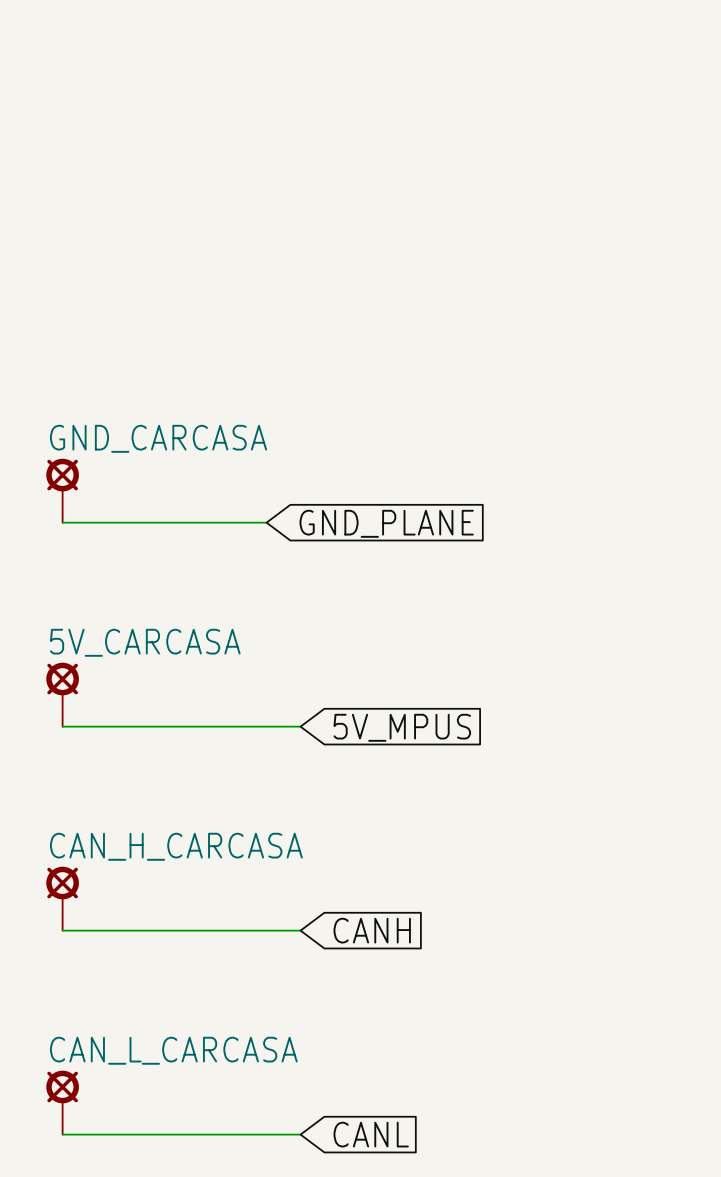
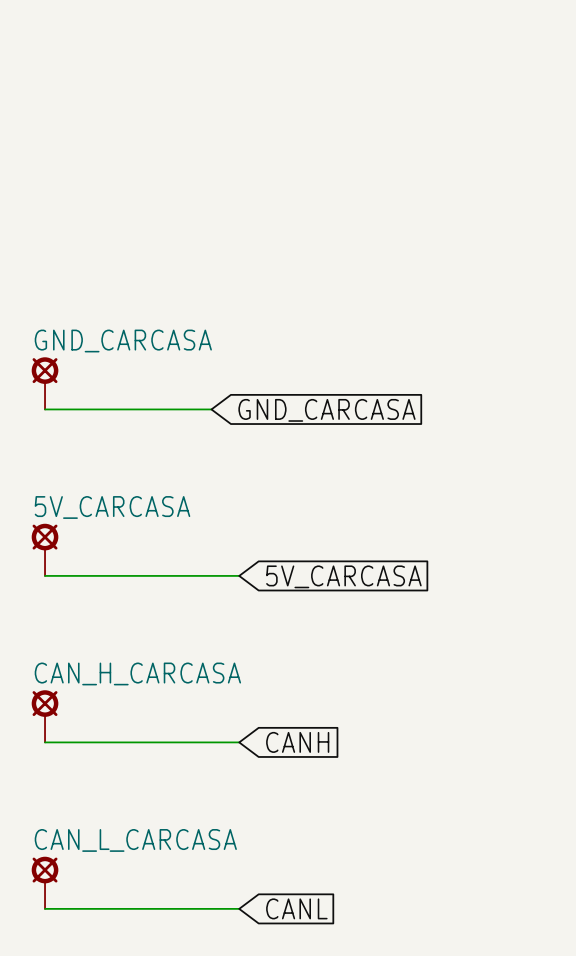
global label: GND_PLANE (386, 523) -> GND_CARCASA (326, 410)
global label: 5V_MPUS (402, 727) -> 5V_CARCASA (343, 576)

